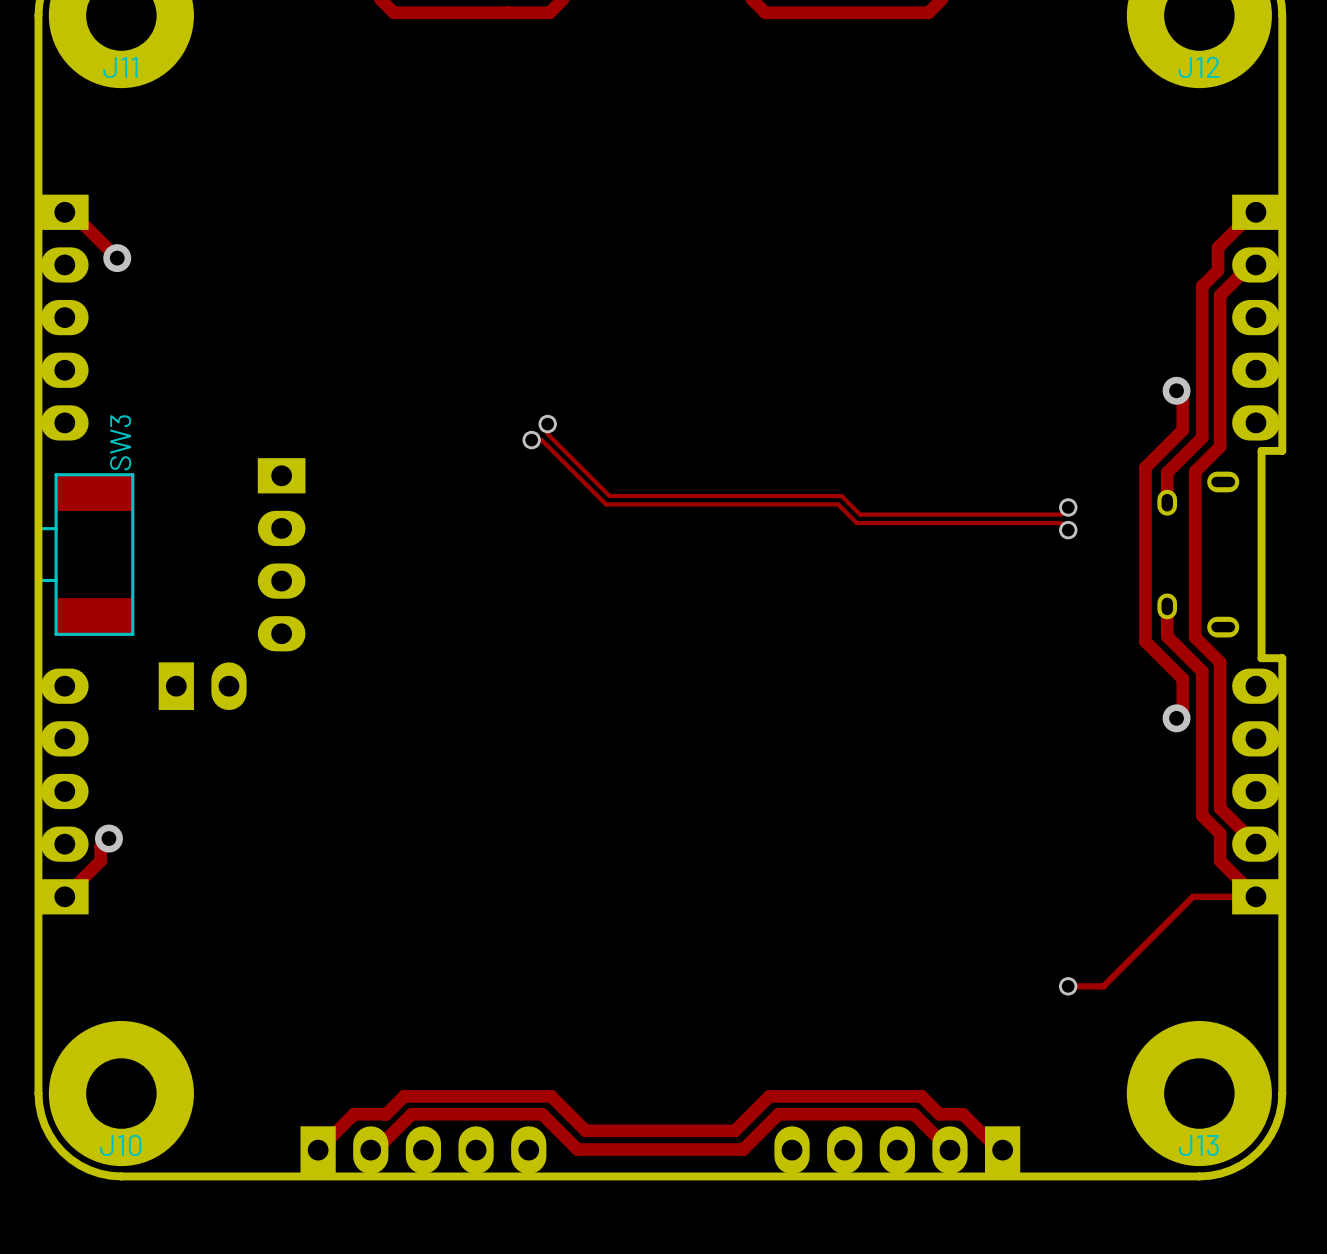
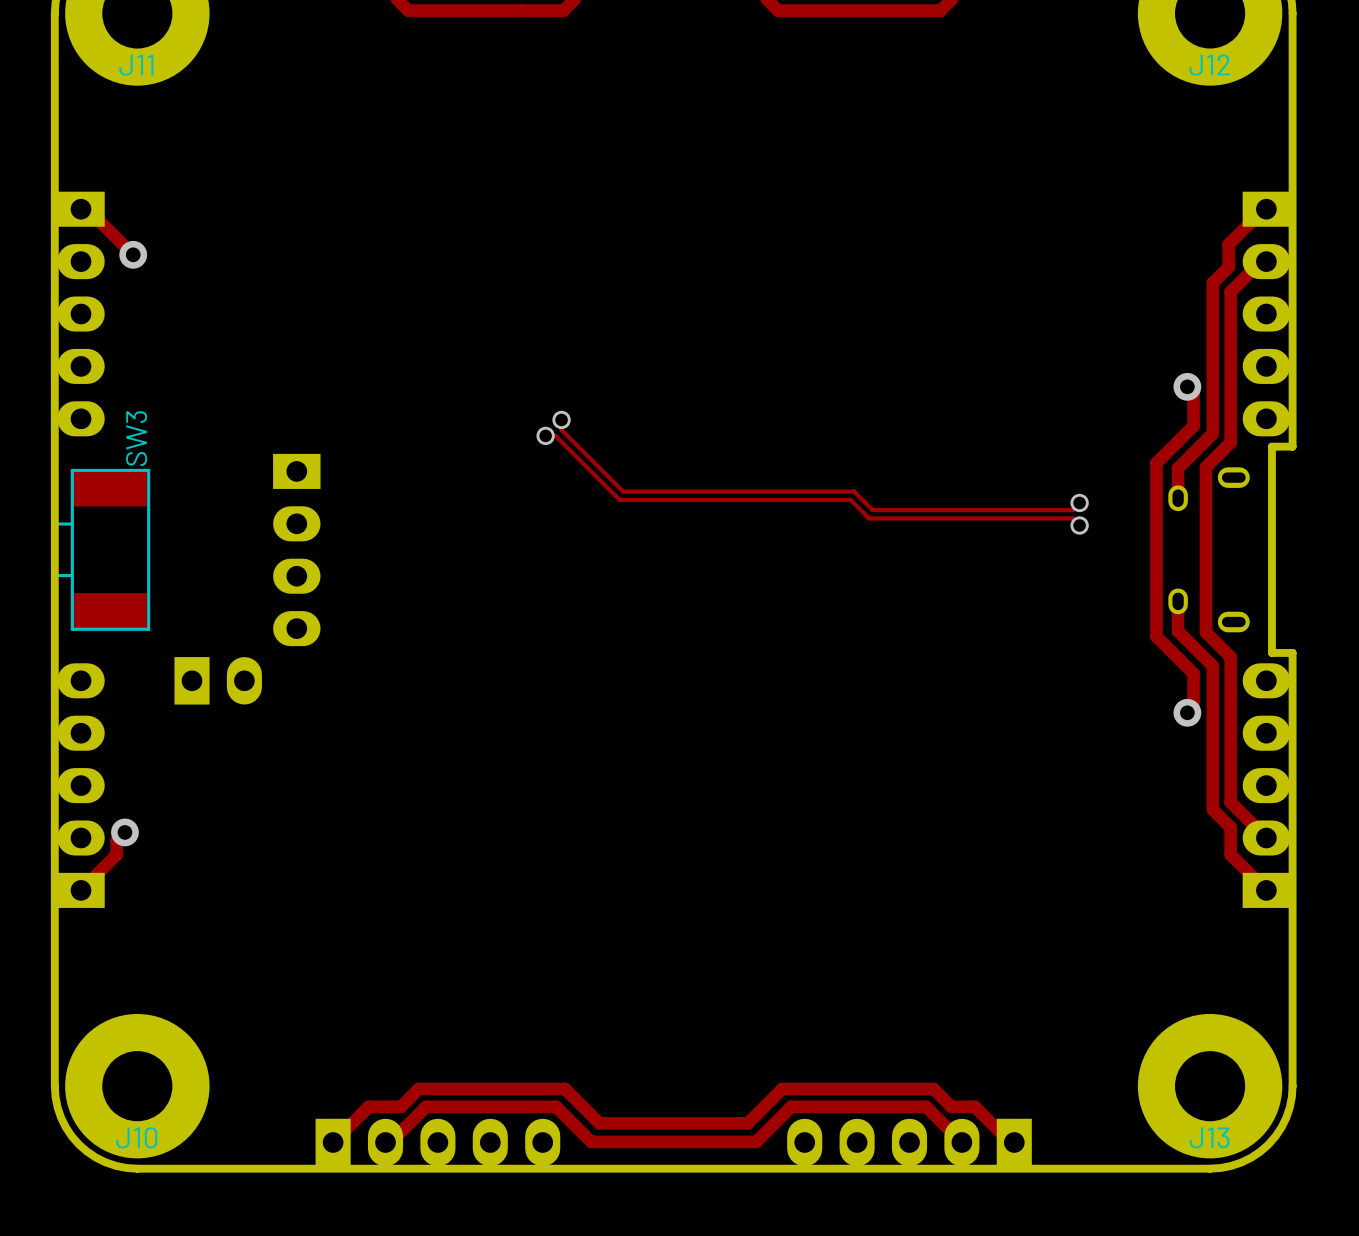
track: (1255, 896) (1192, 896) (1103, 986) (1068, 986) -> none
via: (1068, 986) -> none

